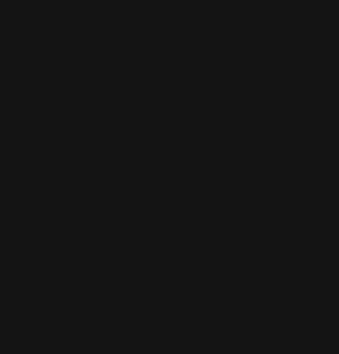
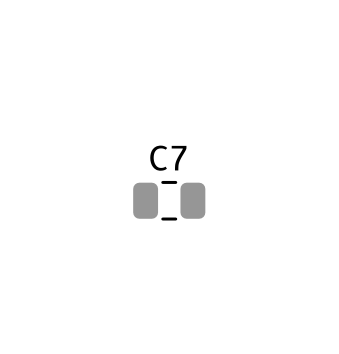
C7: none -> (169, 200)

